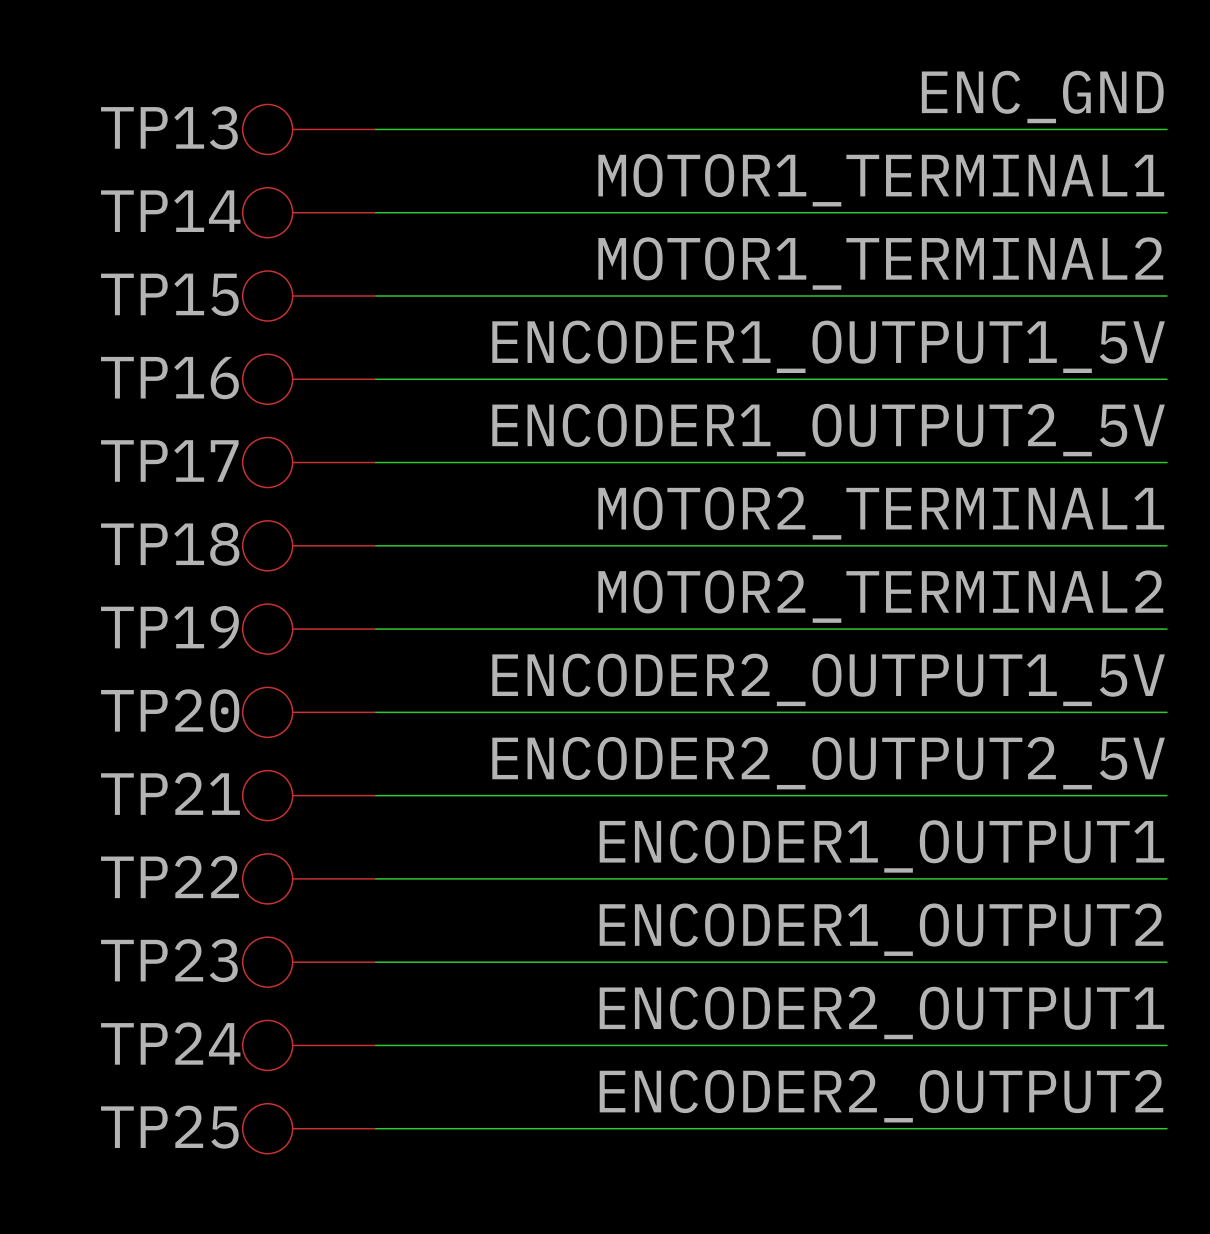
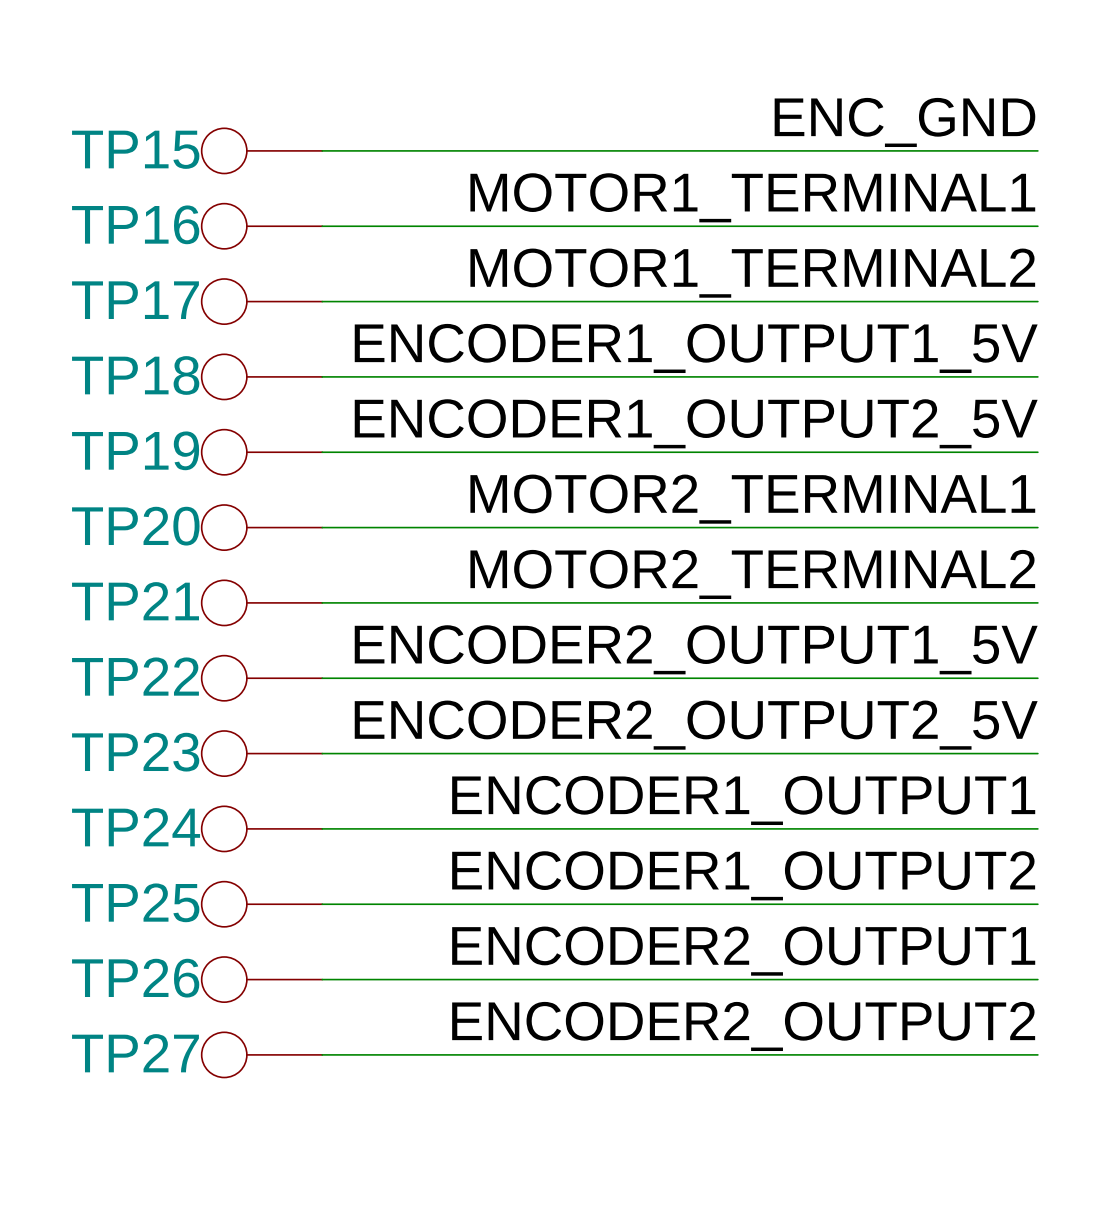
TP13 name: TP13 (169, 127) -> TP15 (135, 149)
TP14 name: TP14 (170, 211) -> TP16 (135, 224)
TP15 name: TP15 (169, 294) -> TP17 (135, 300)
TP16 name: TP16 (169, 378) -> TP18 (135, 375)
TP17 name: TP17 (169, 460) -> TP19 (135, 450)
TP18 name: TP18 (170, 544) -> TP20 (135, 526)
TP19 name: TP19 (169, 627) -> TP21 (135, 601)
TP20 name: TP20 (170, 710) -> TP22 (135, 676)
TP21 name: TP21 (170, 793) -> TP23 (135, 752)
TP22 name: TP22 (169, 876) -> TP24 (136, 827)
TP23 name: TP23 (169, 960) -> TP25 (135, 902)
TP24 name: TP24 (170, 1043) -> TP26 (135, 978)
TP25 name: TP25 (169, 1127) -> TP27 (135, 1053)

